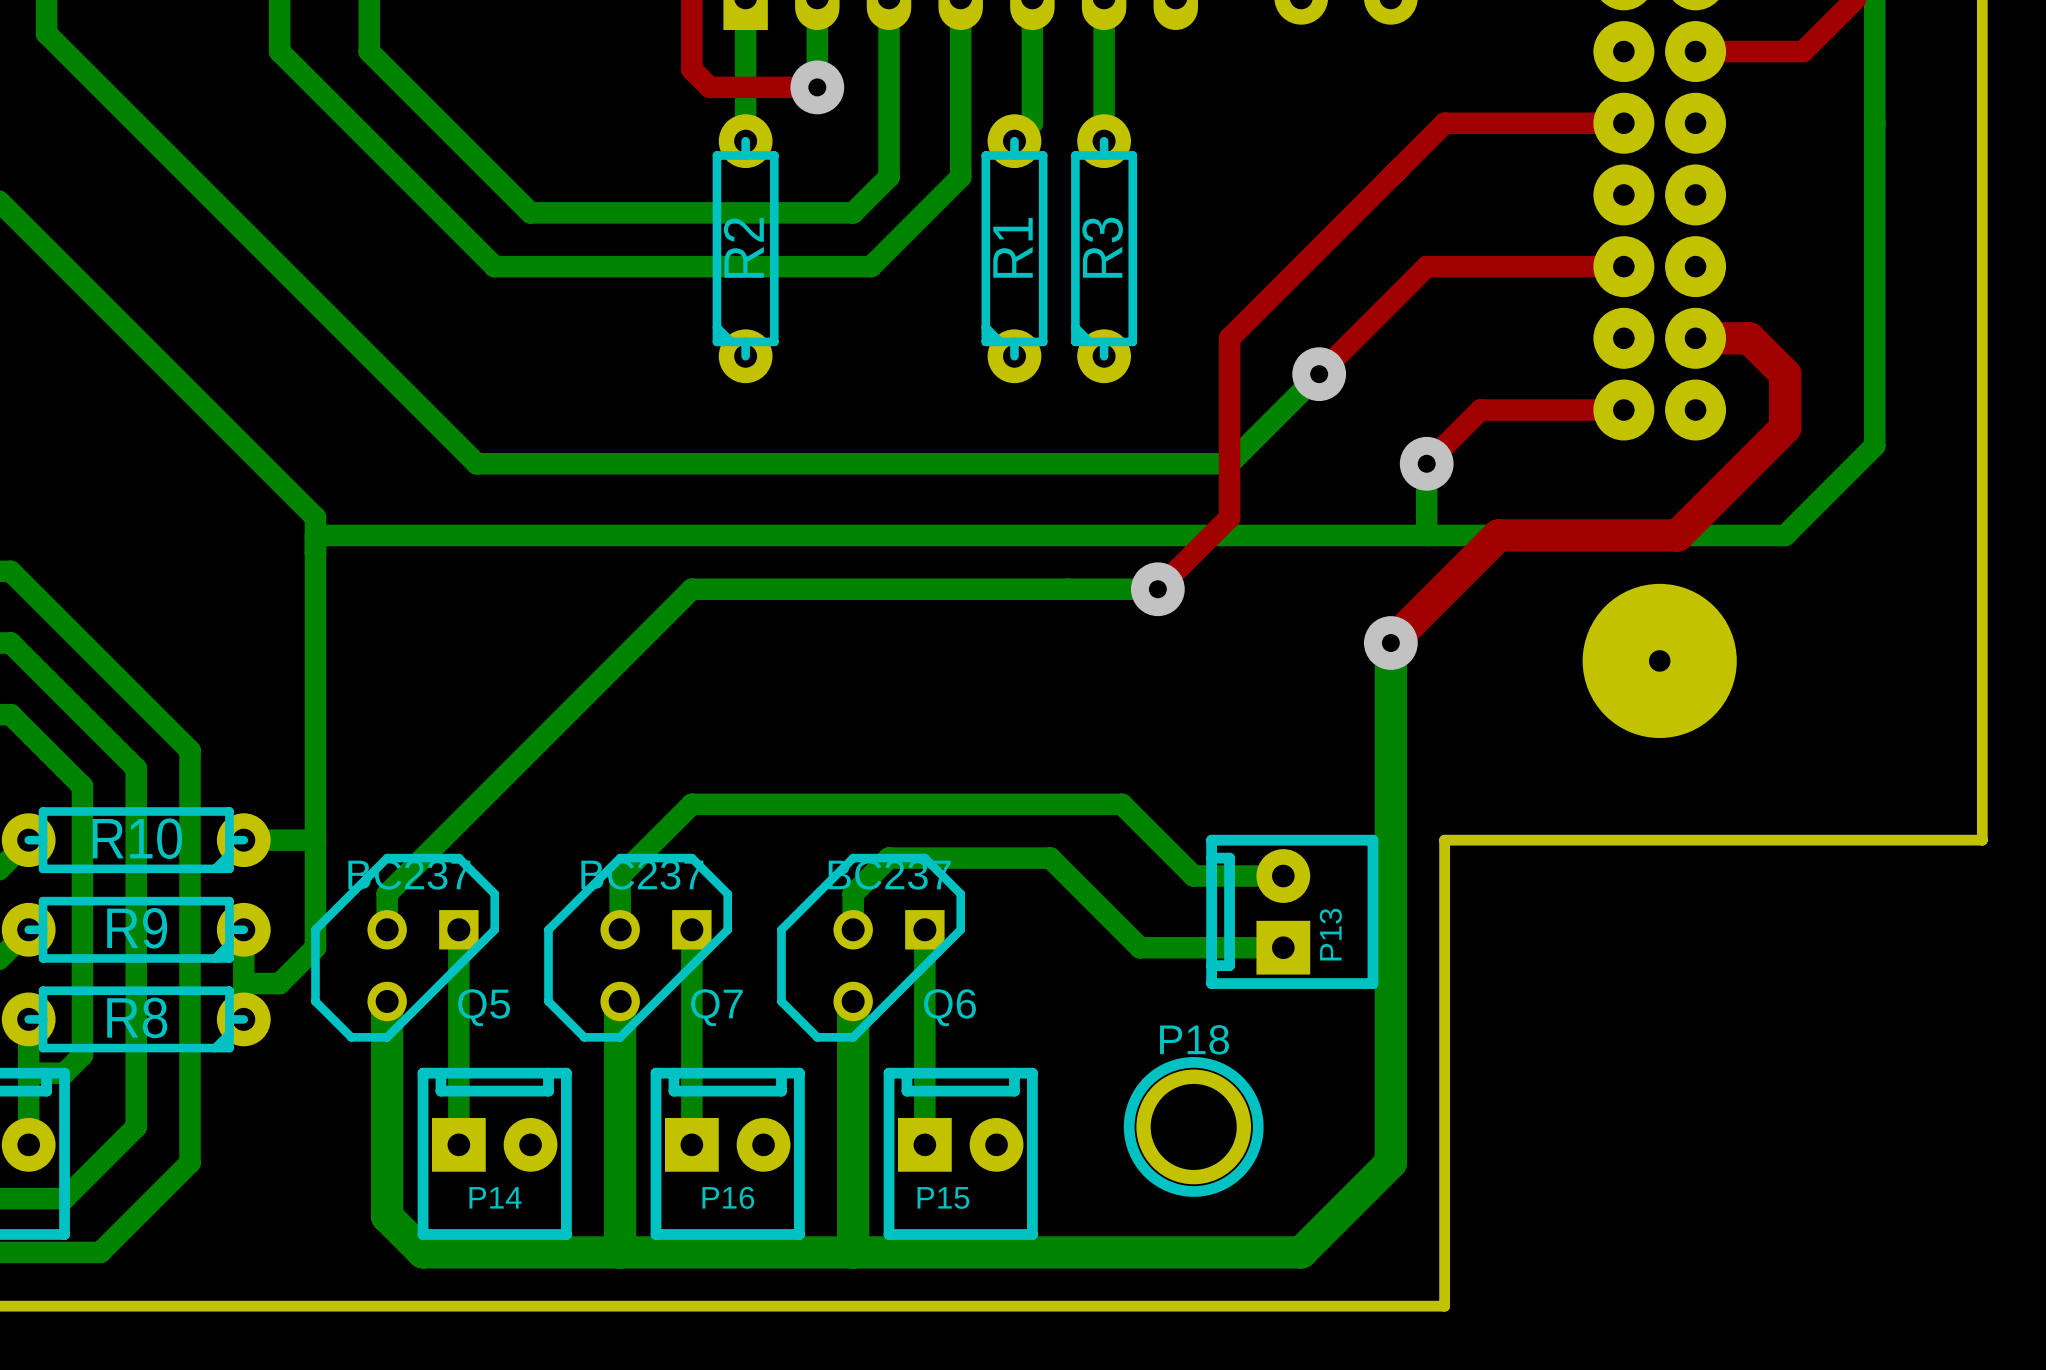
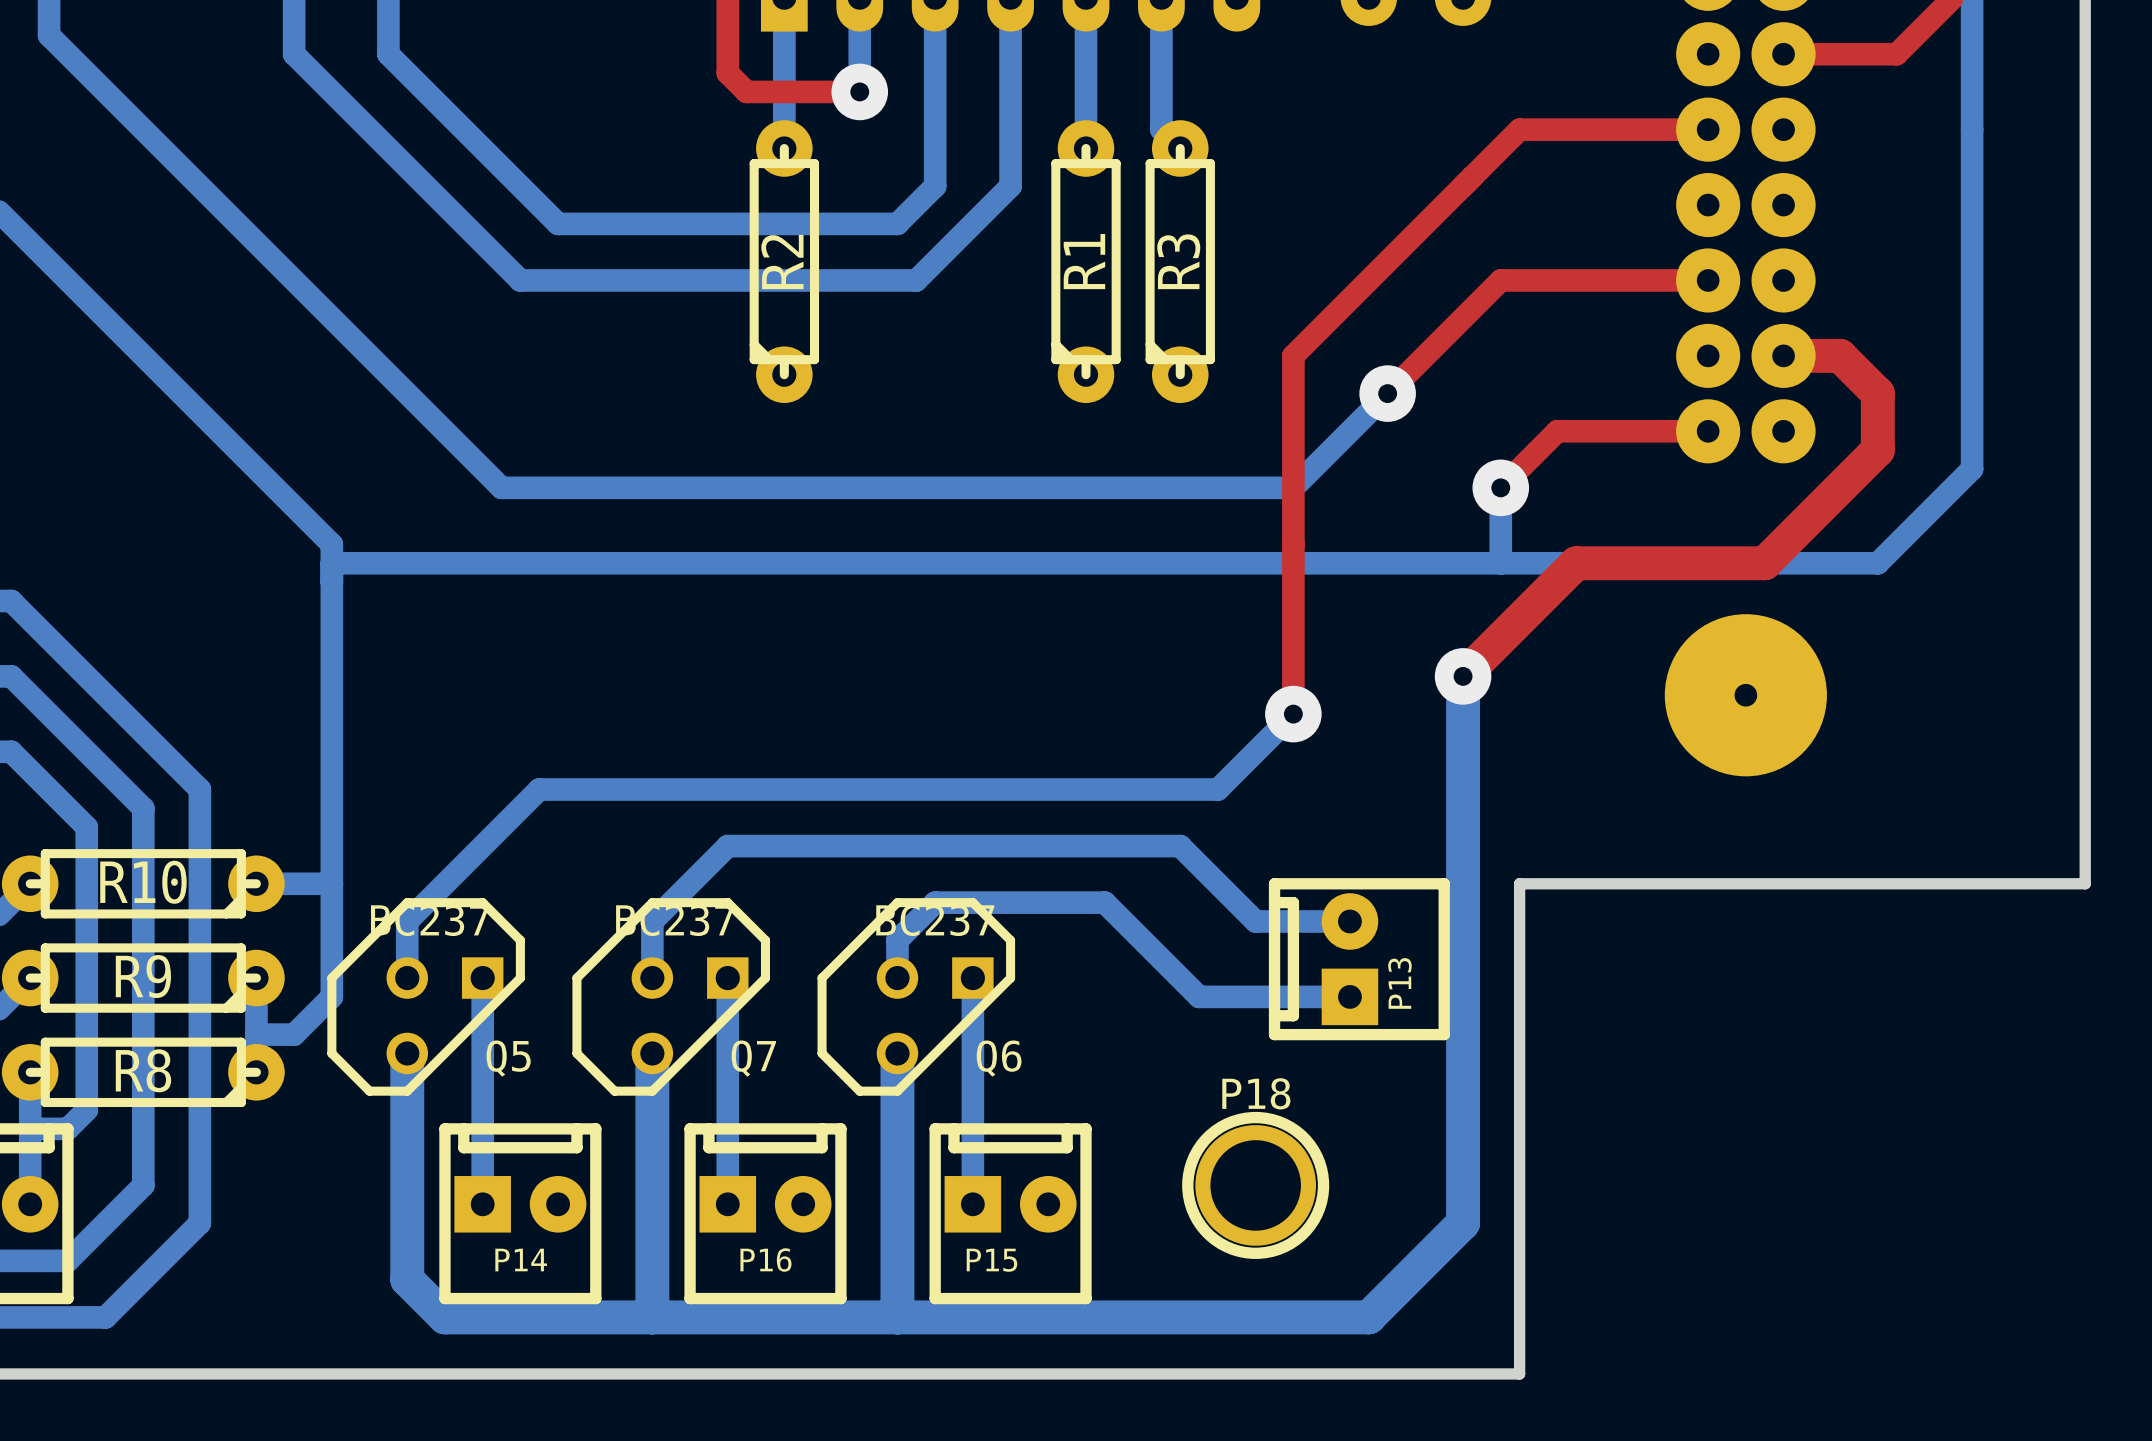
R1 position: (1014, 248) -> (1085, 261)
R3 position: (1104, 248) -> (1180, 261)
top track: (1229, 517) (1157, 589) -> (1293, 544) (1293, 714)
bottom track: (1157, 589) (691, 589) (387, 893) -> (1293, 714) (1217, 789) (539, 789) (407, 921) (407, 940)
via position: (1157, 589) -> (1293, 714)

